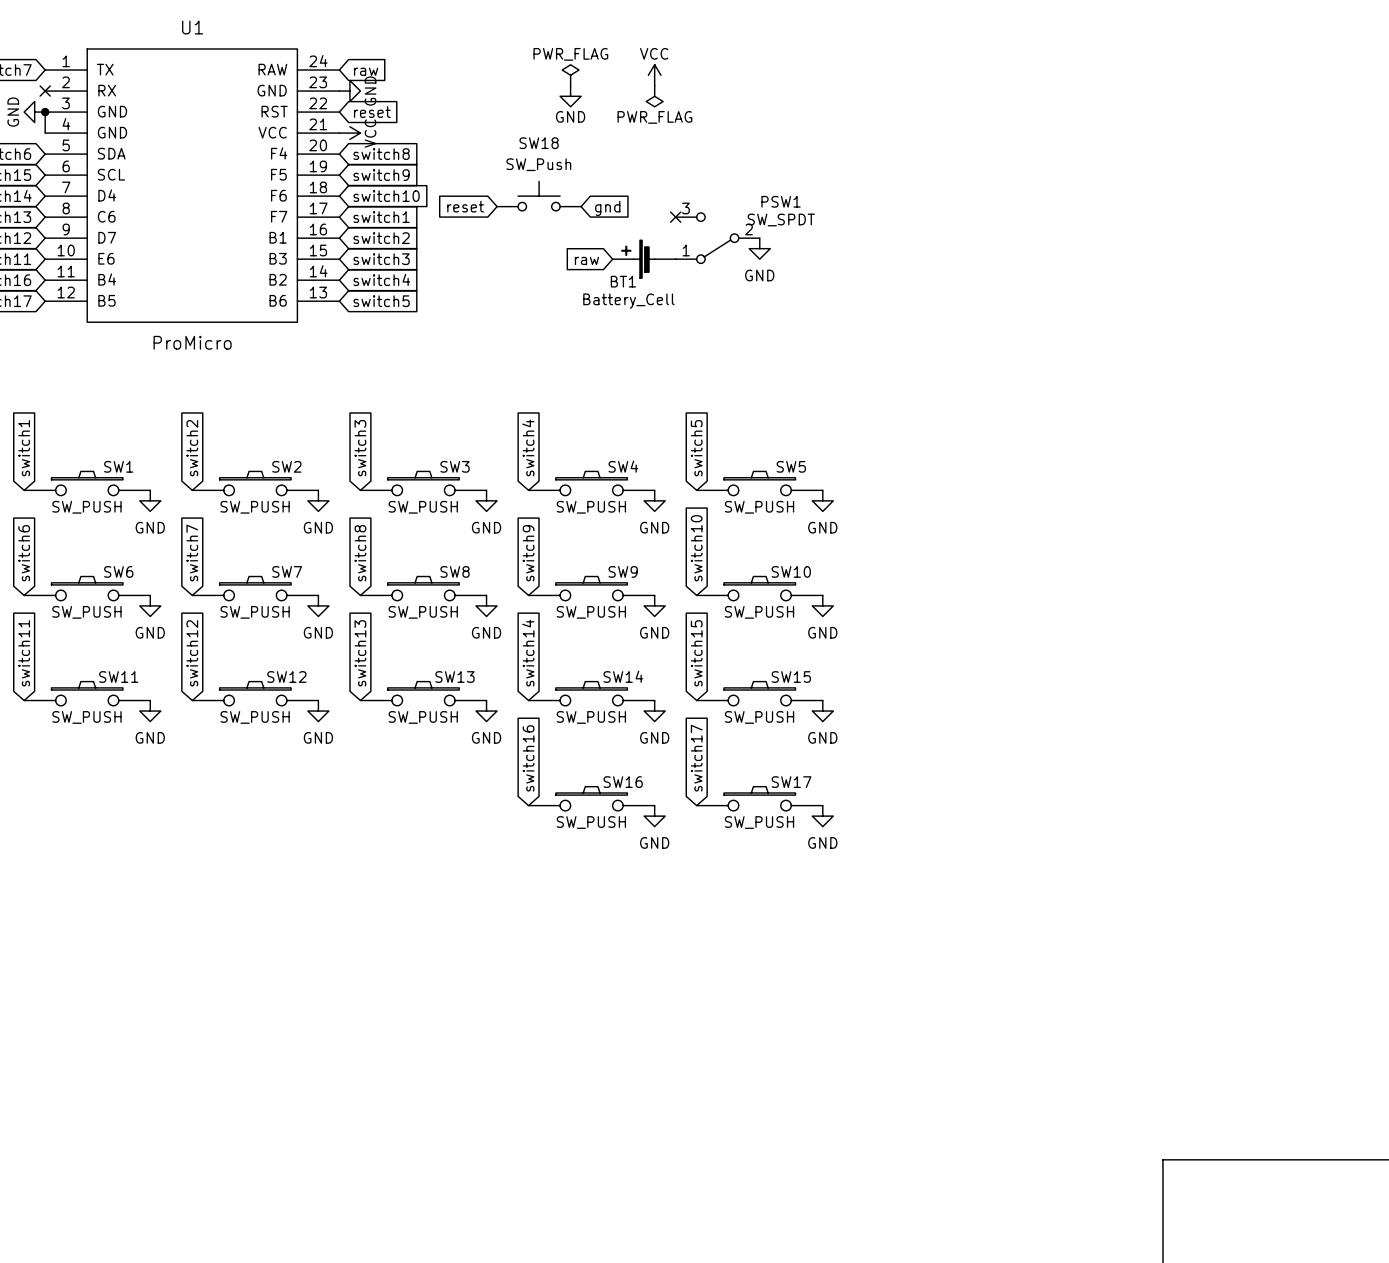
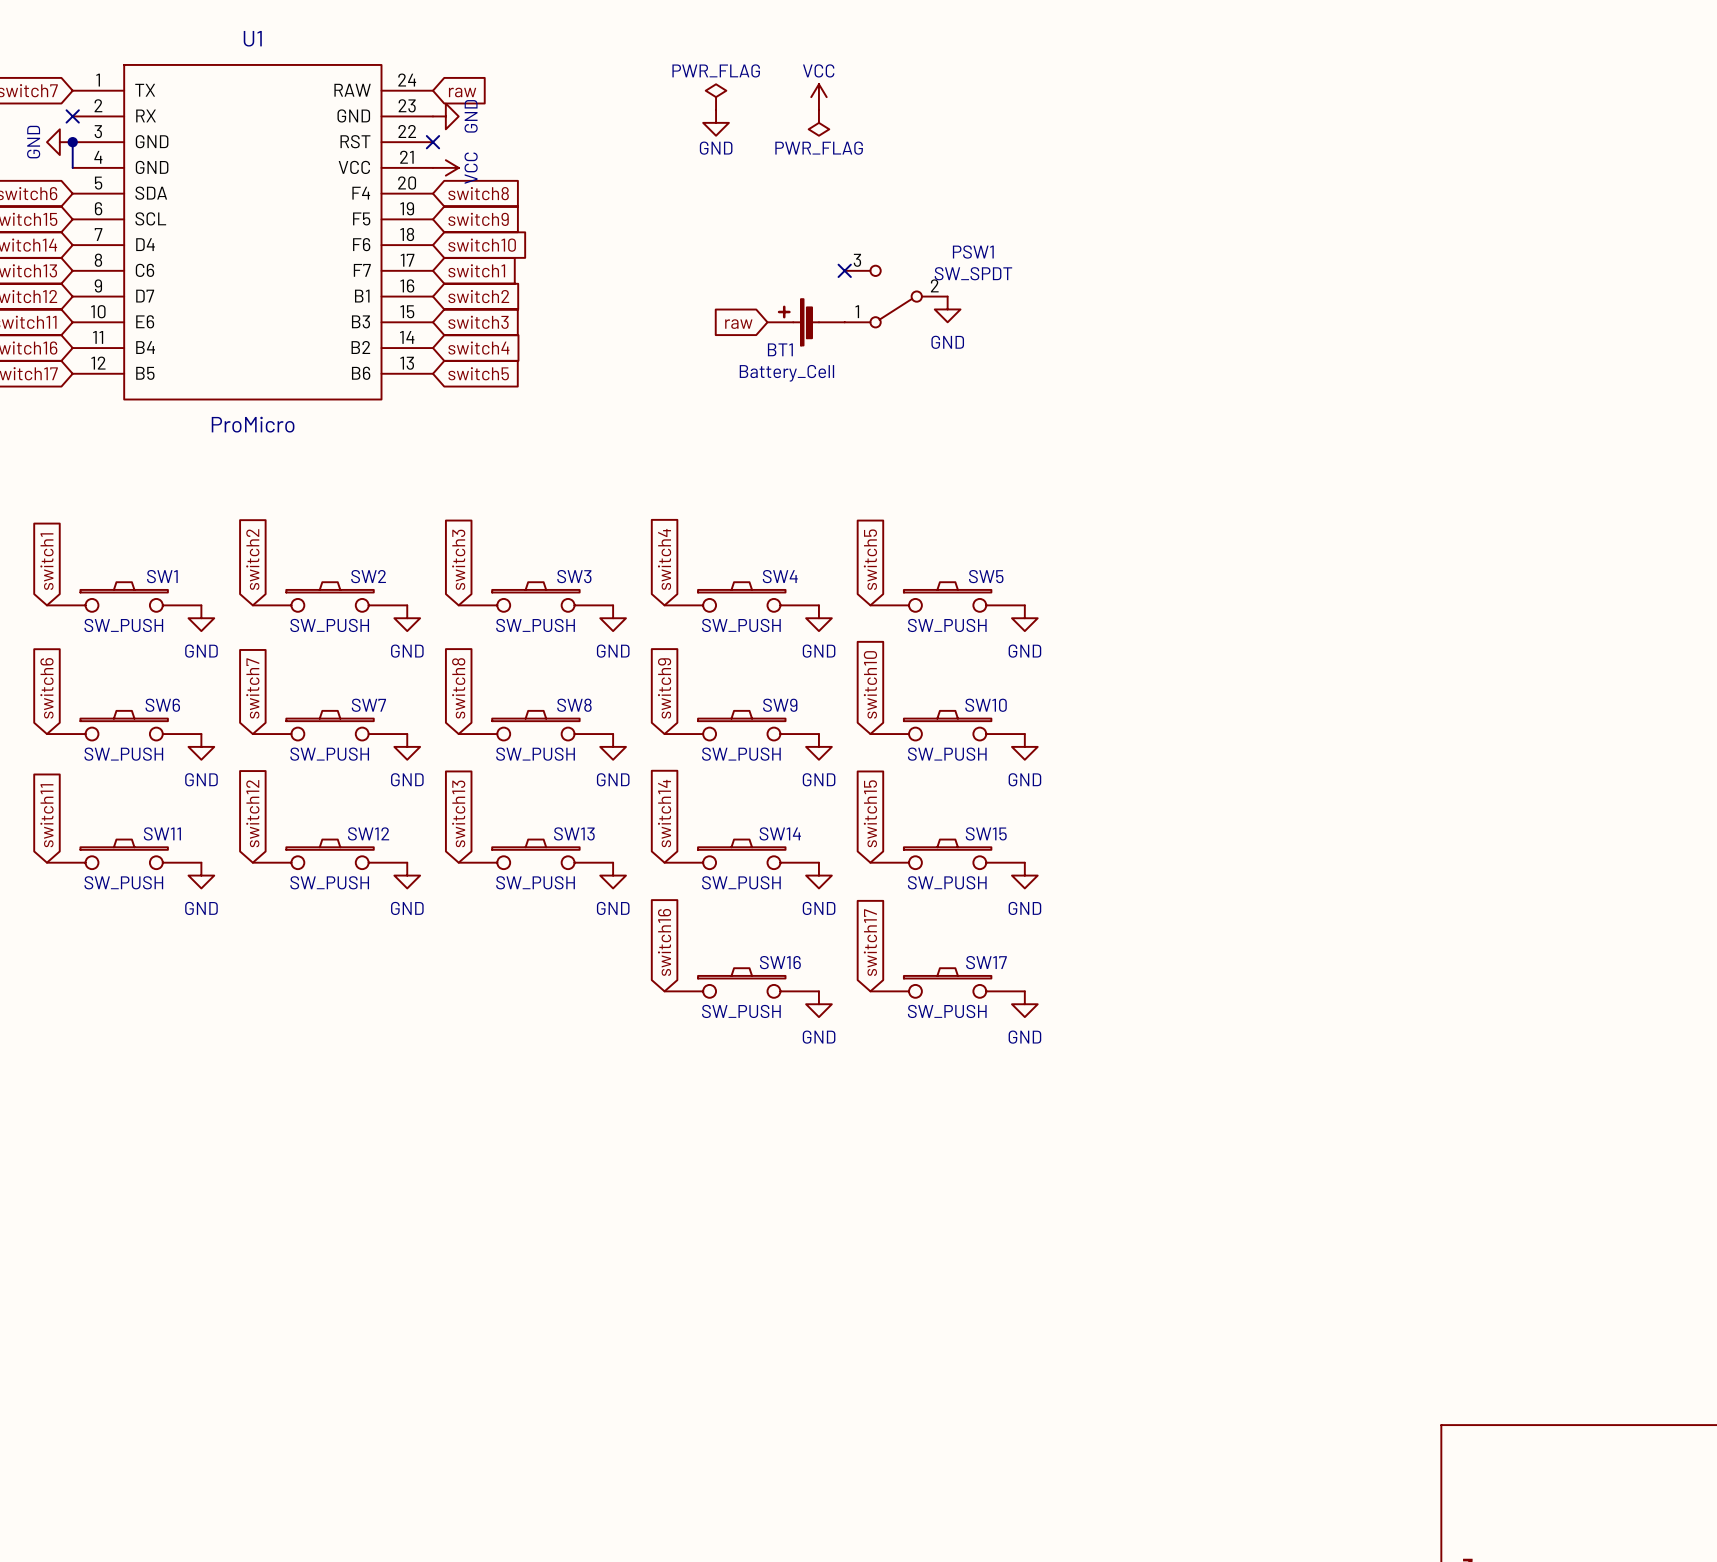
no-connect mark: none -> (432, 142)
global label: reset (372, 112) -> none
SW18: SW_Push (539, 196) -> none
global label: reset (465, 206) -> none
global label: gnd (607, 208) -> none

